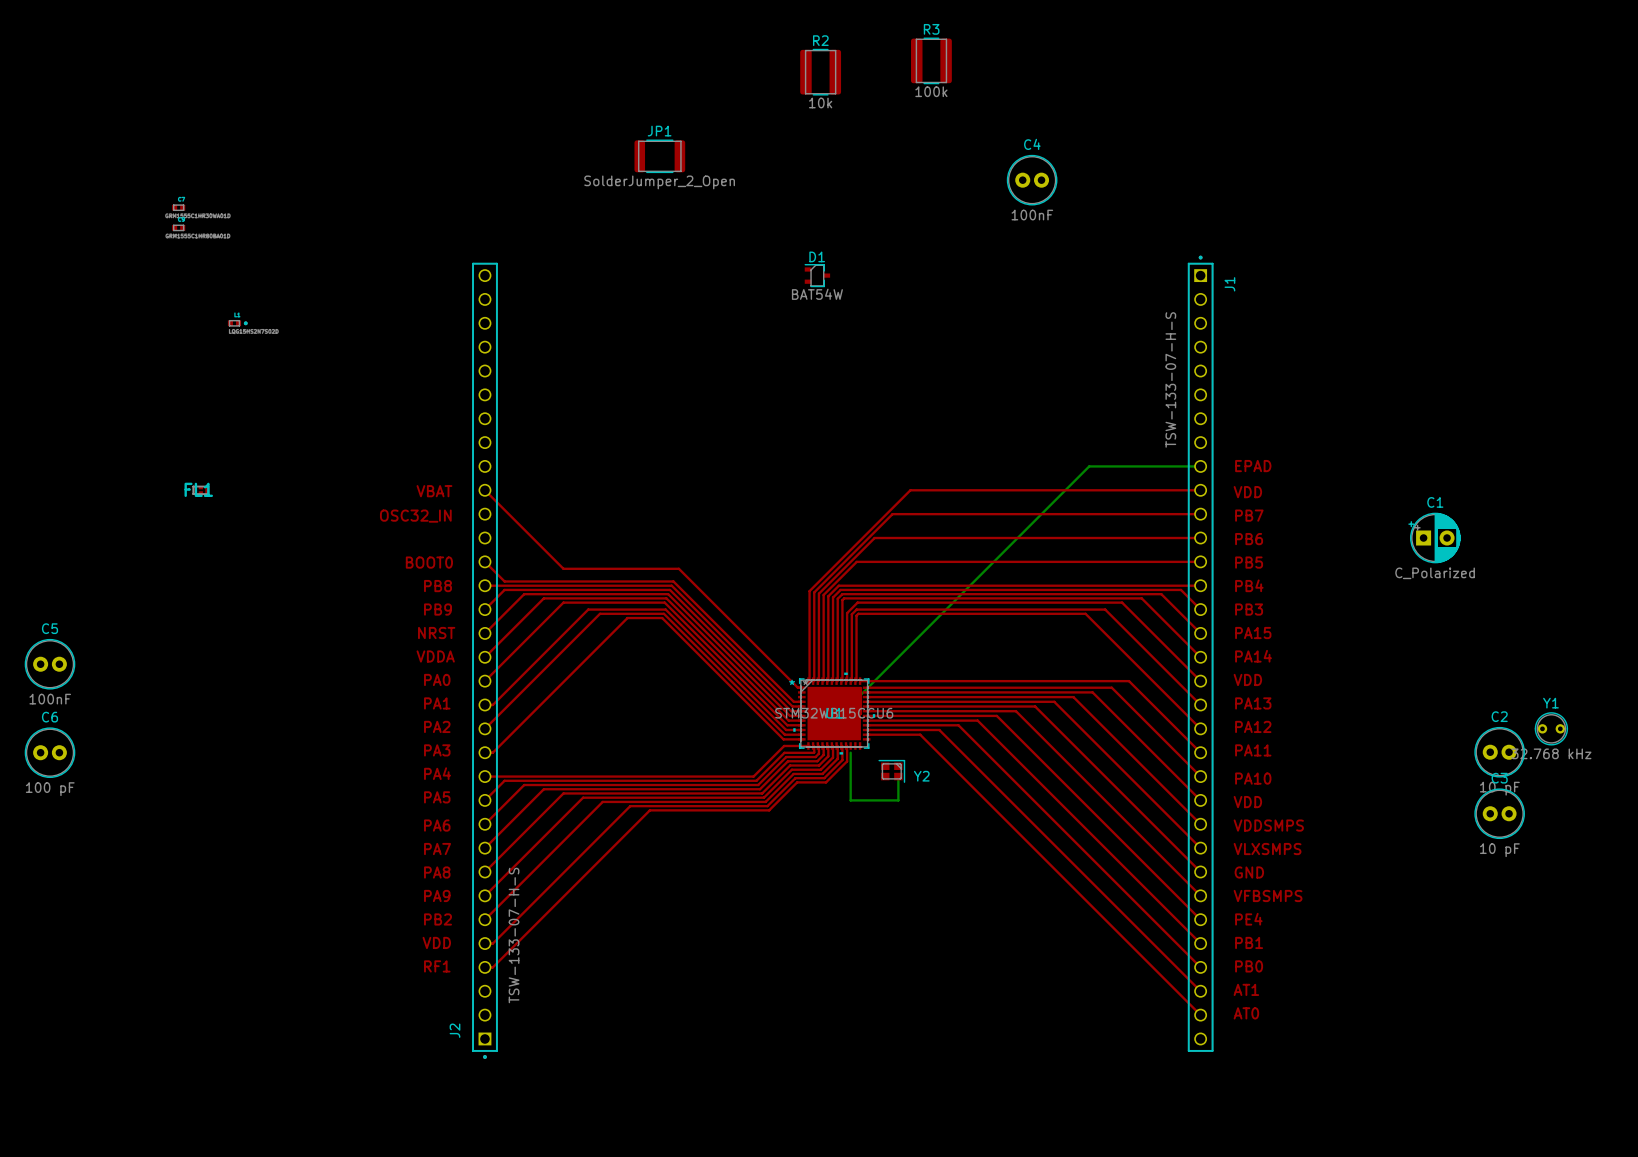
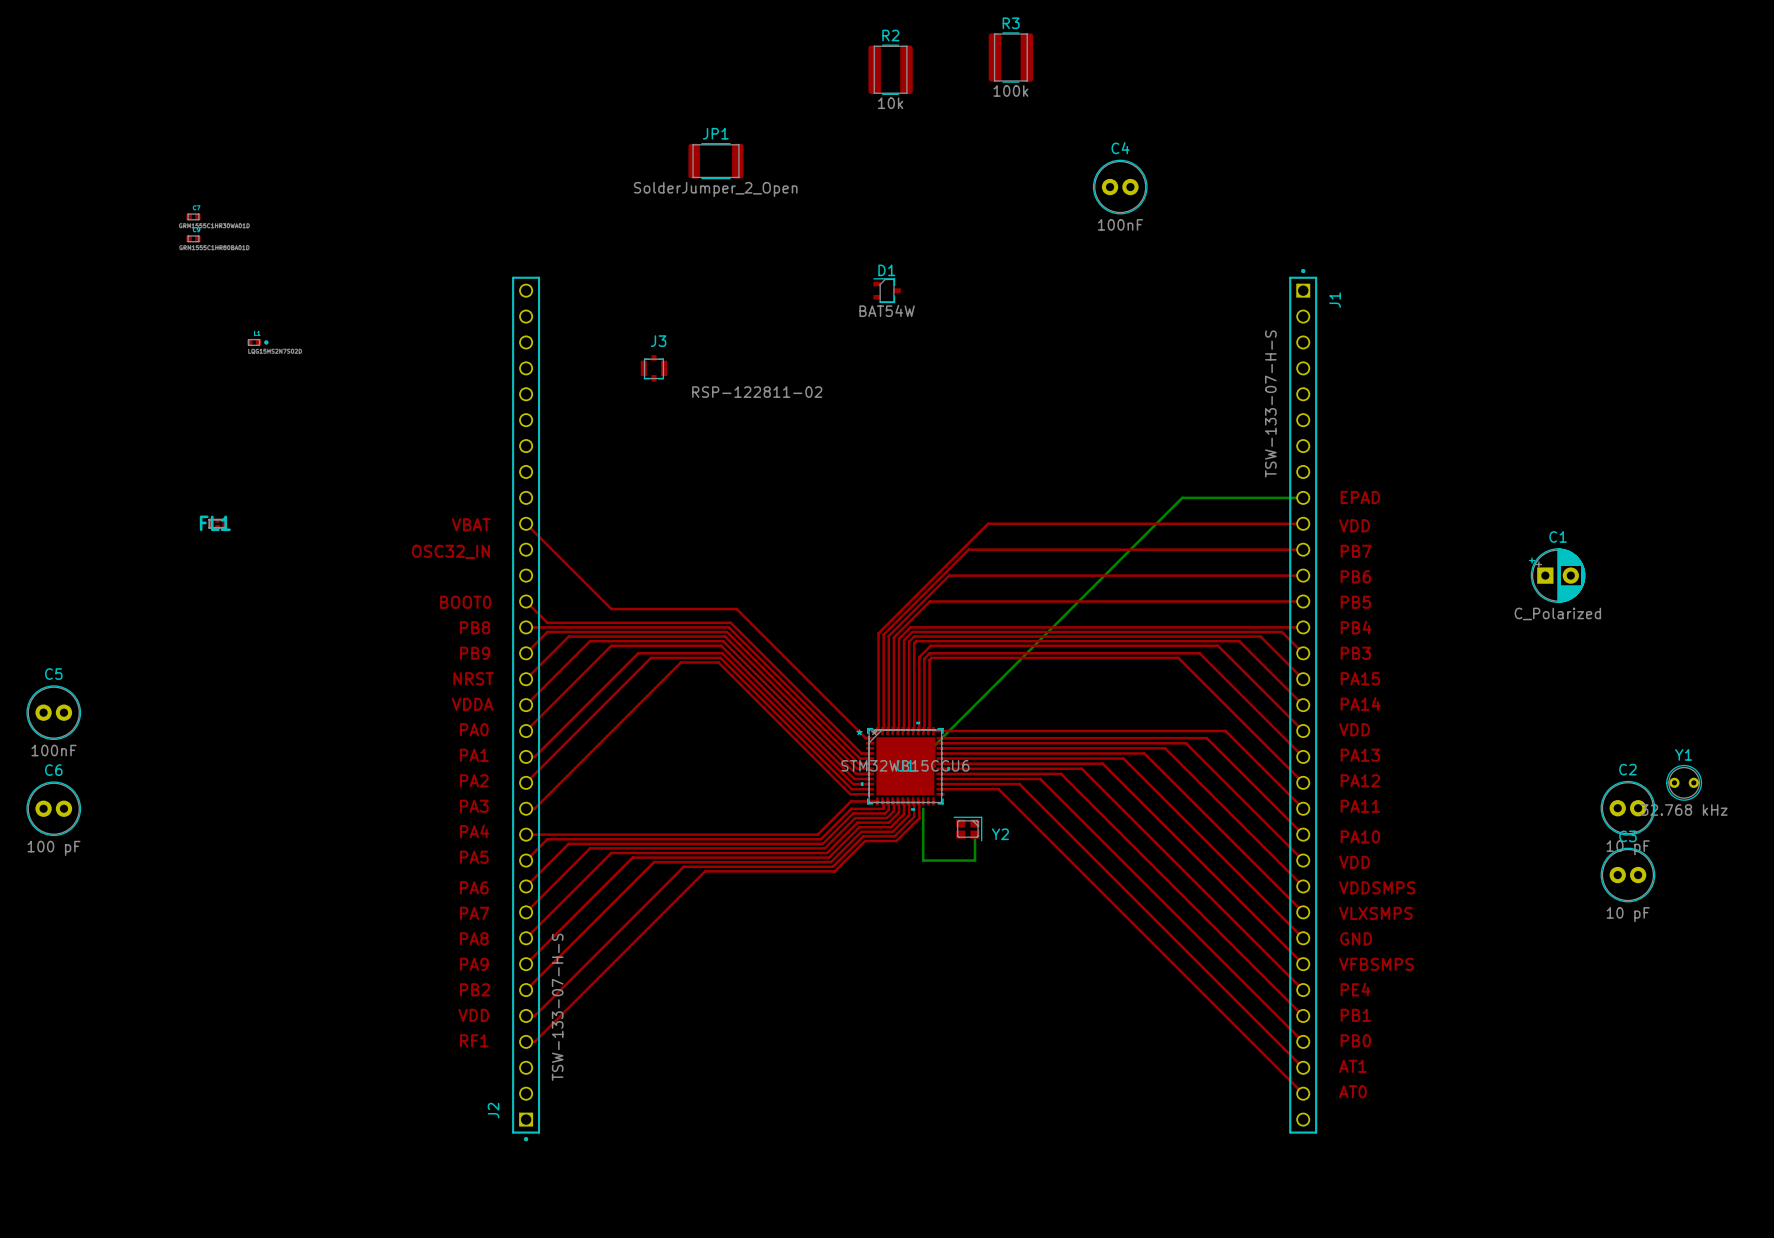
J3: none -> RSP-122811-02 (653, 368)

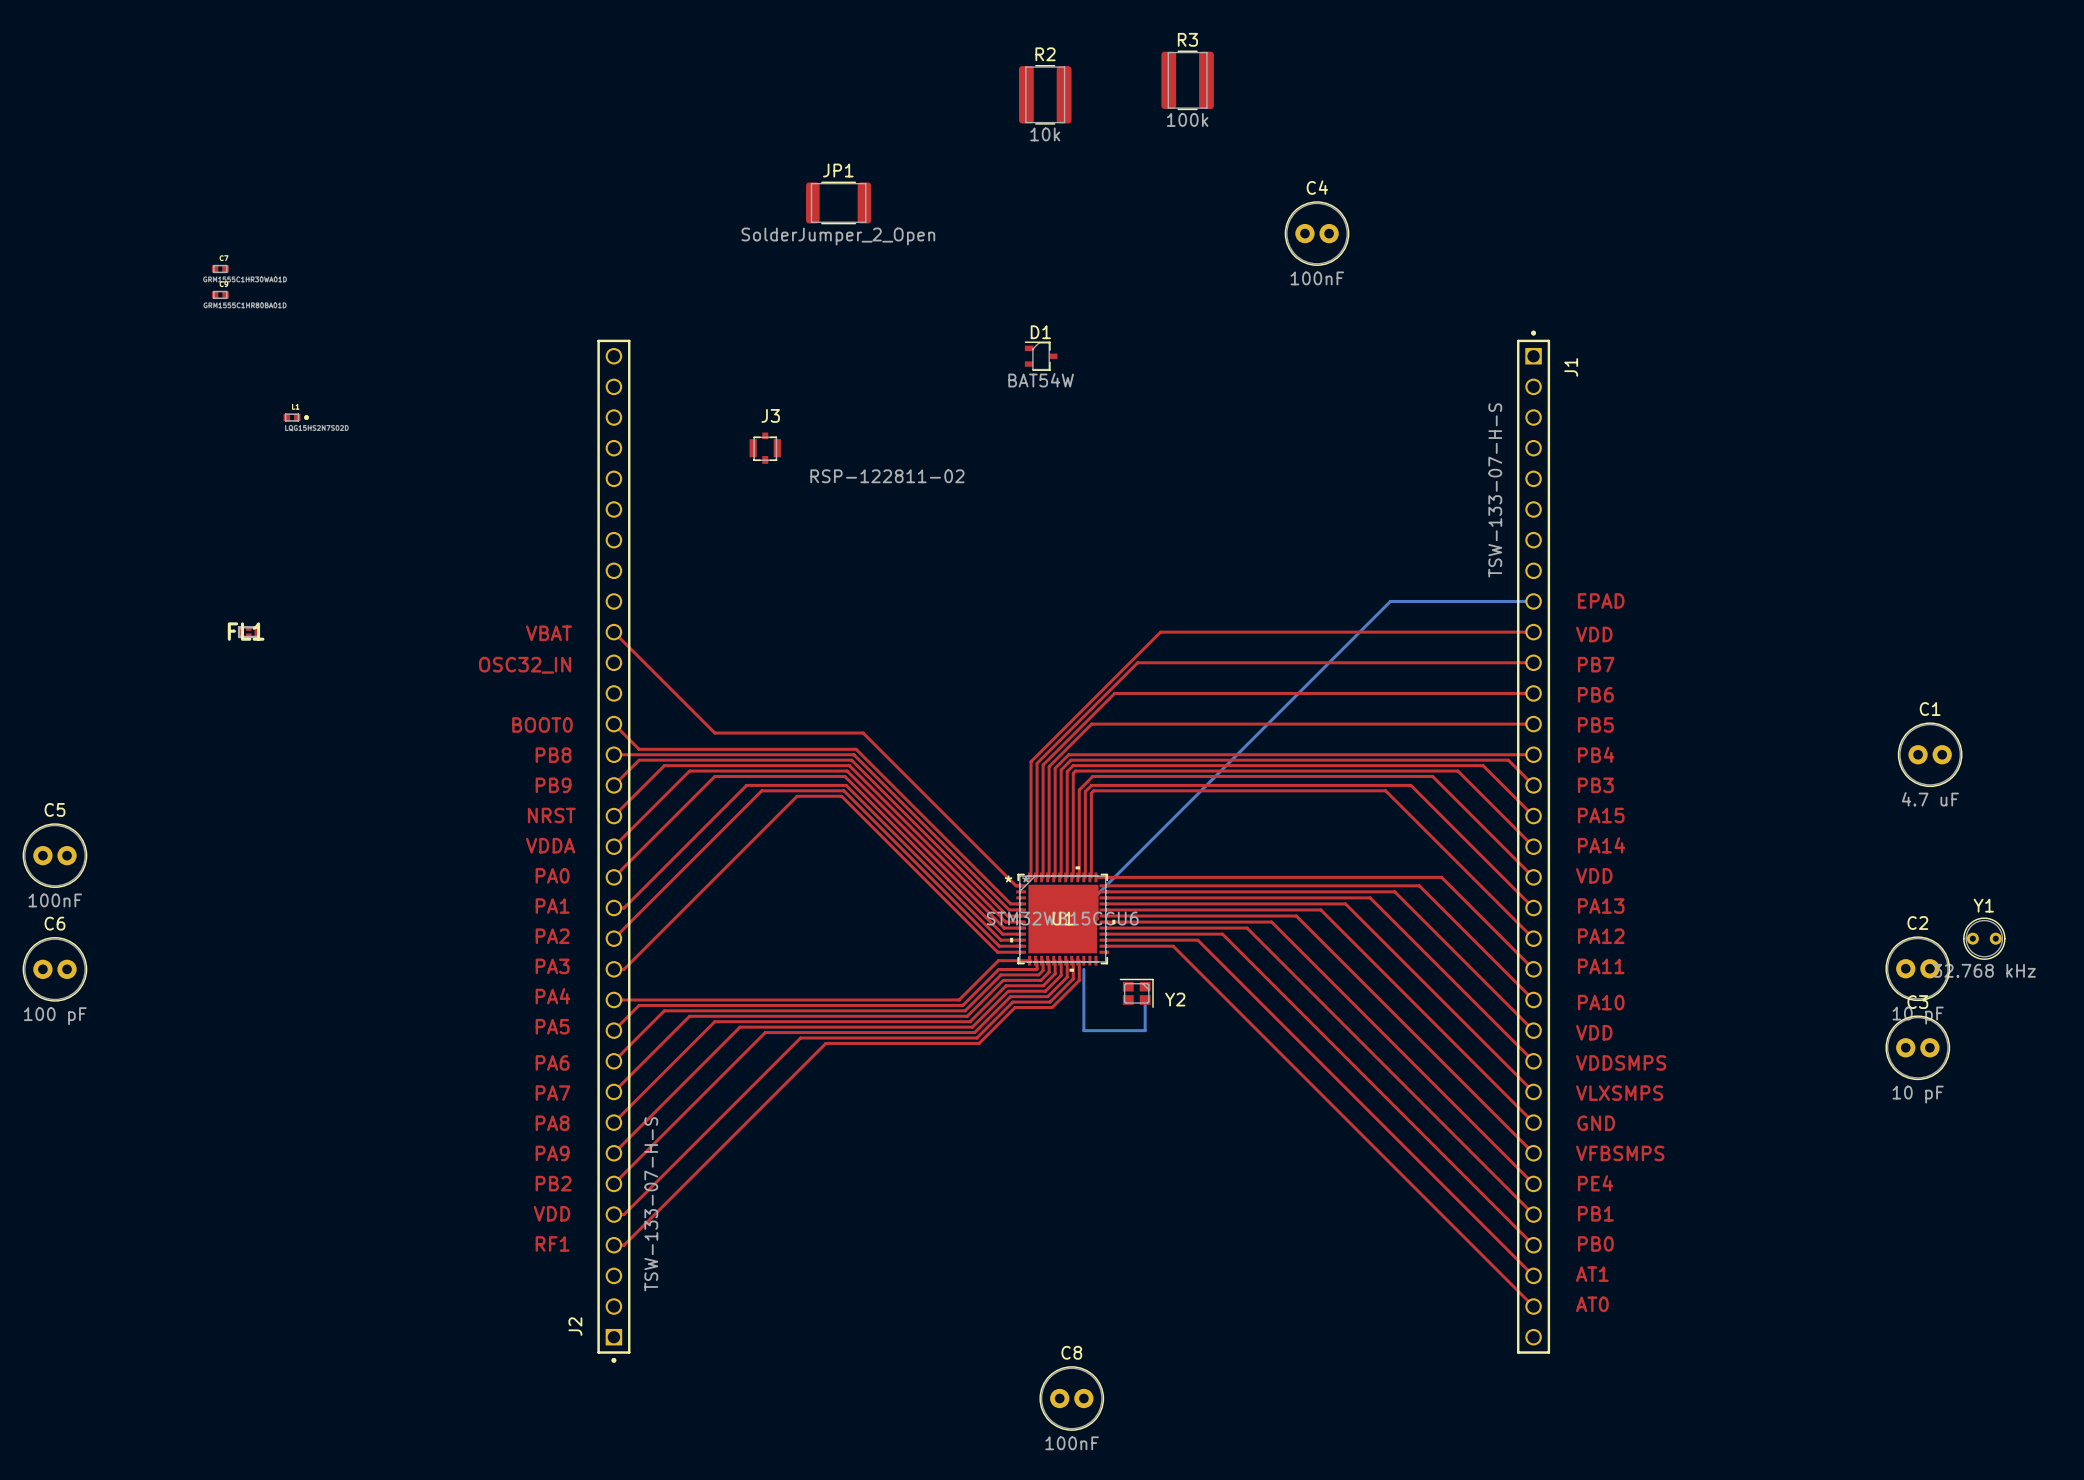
C1 footprint: [1528, 548, 1586, 603] -> [1897, 722, 1963, 788]
C1 value: C_Polarized (1557, 613) -> 4.7 uF (1930, 799)
C8: none -> 100nF (1071, 1398)

